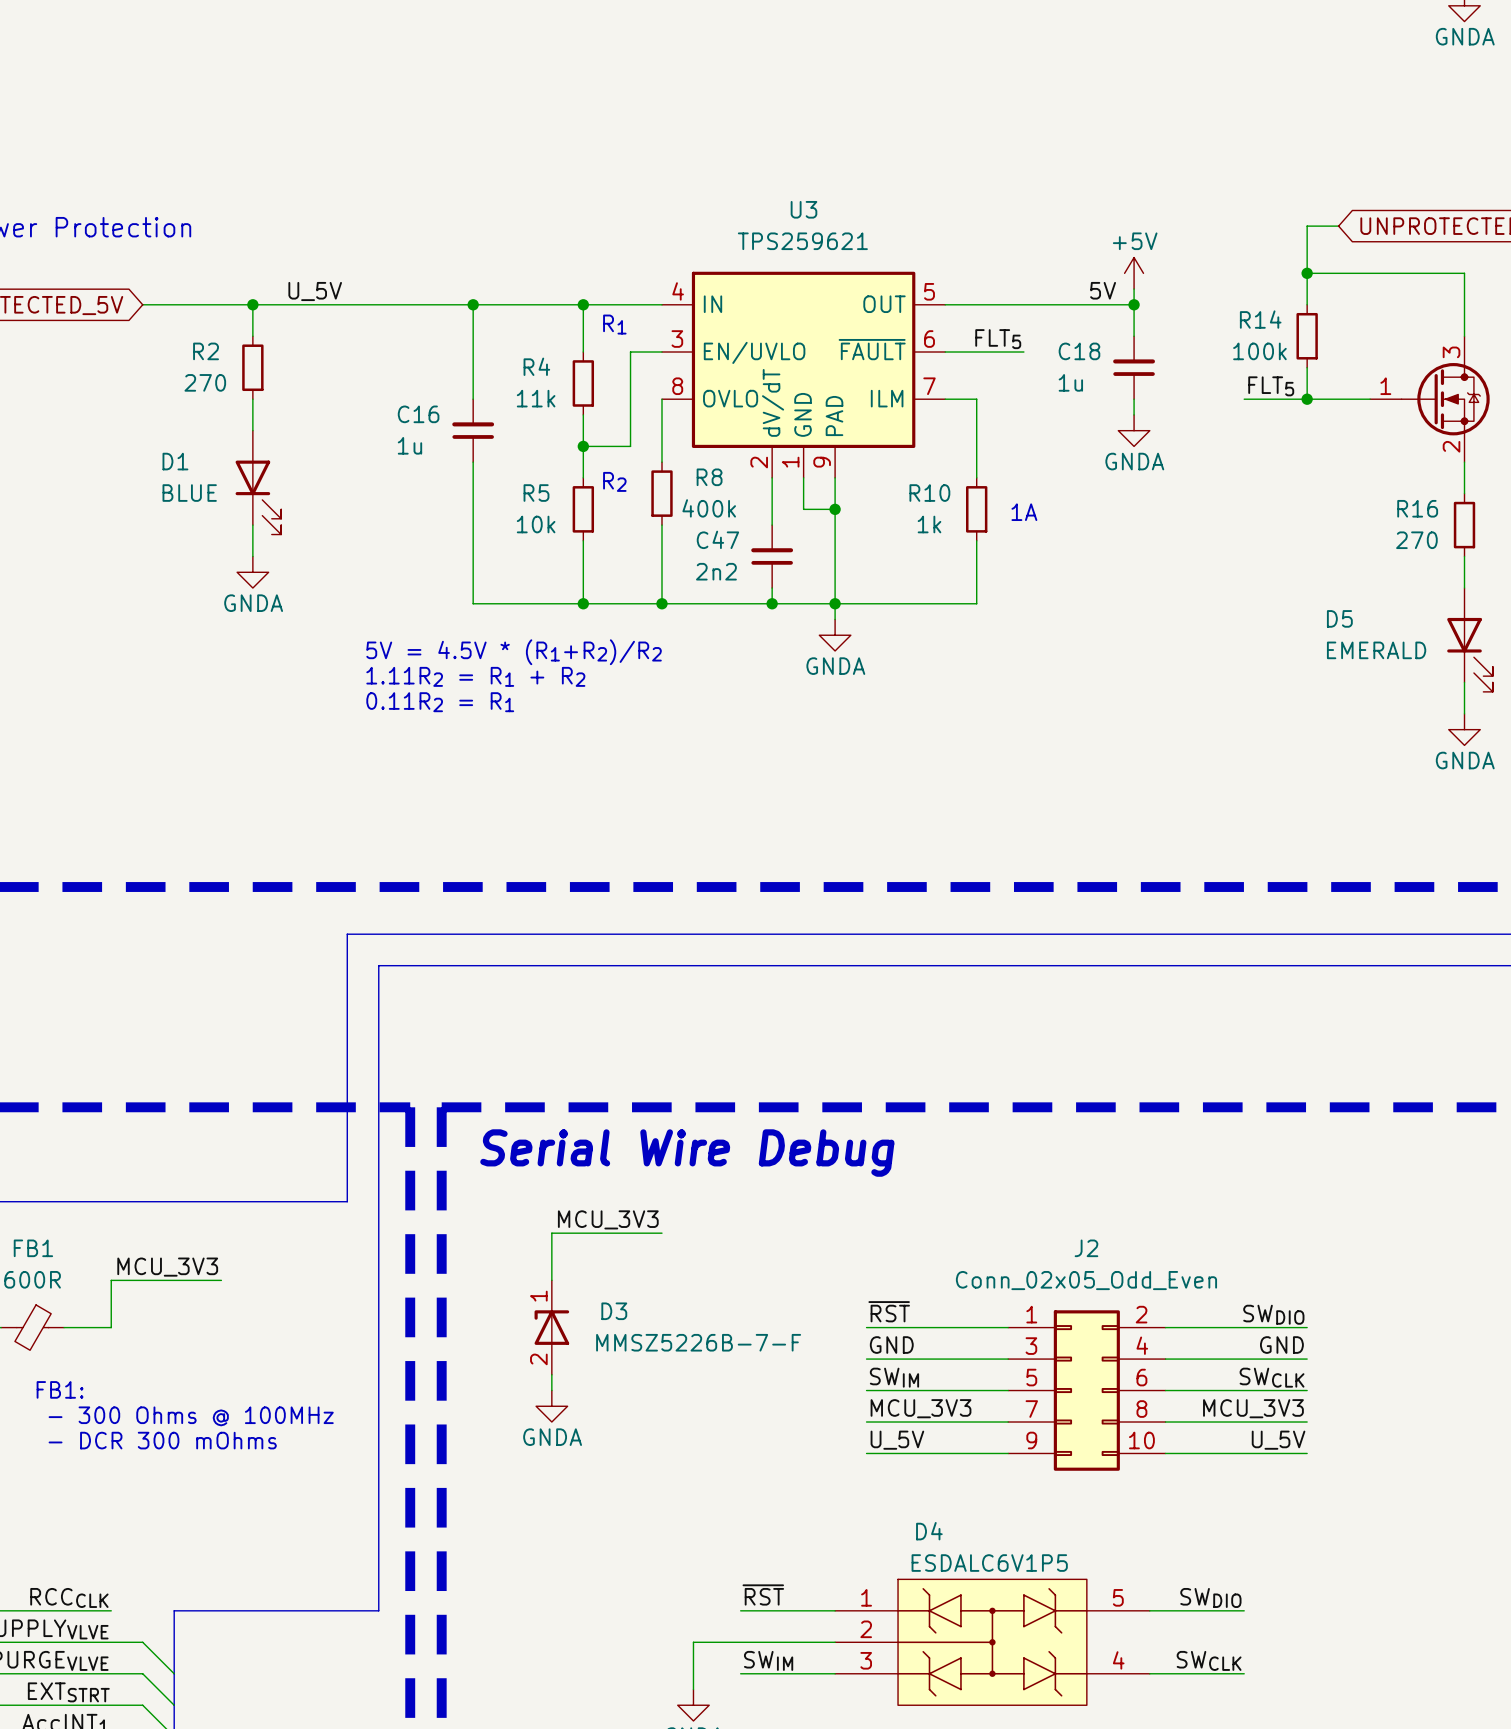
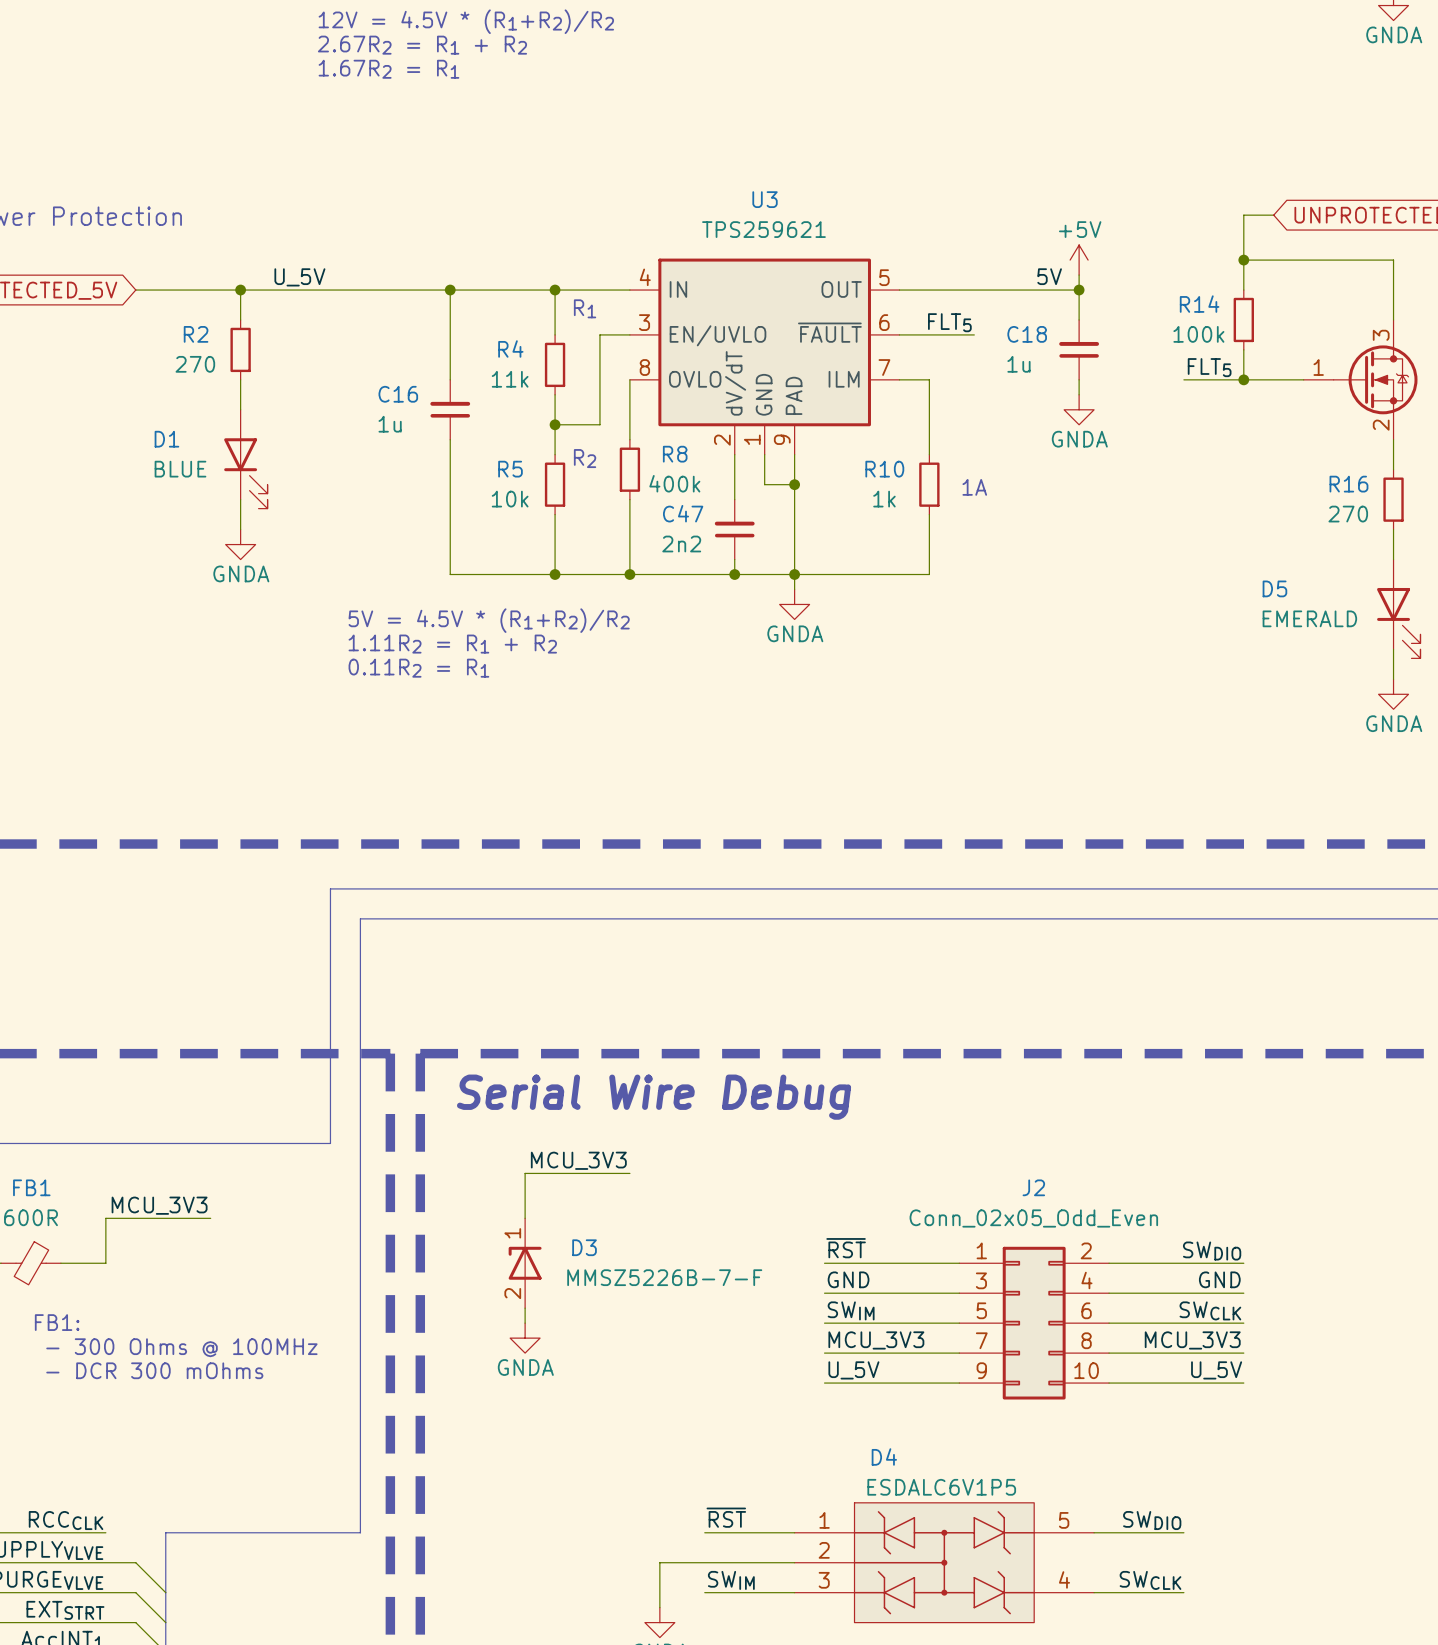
text: none -> 12V = 4.5V * (R1+R2)/R2 (466, 21)
text: none -> 2.67R2 = R1 + R2 (422, 45)
text: none -> 1.67R2 = R1 (388, 69)

